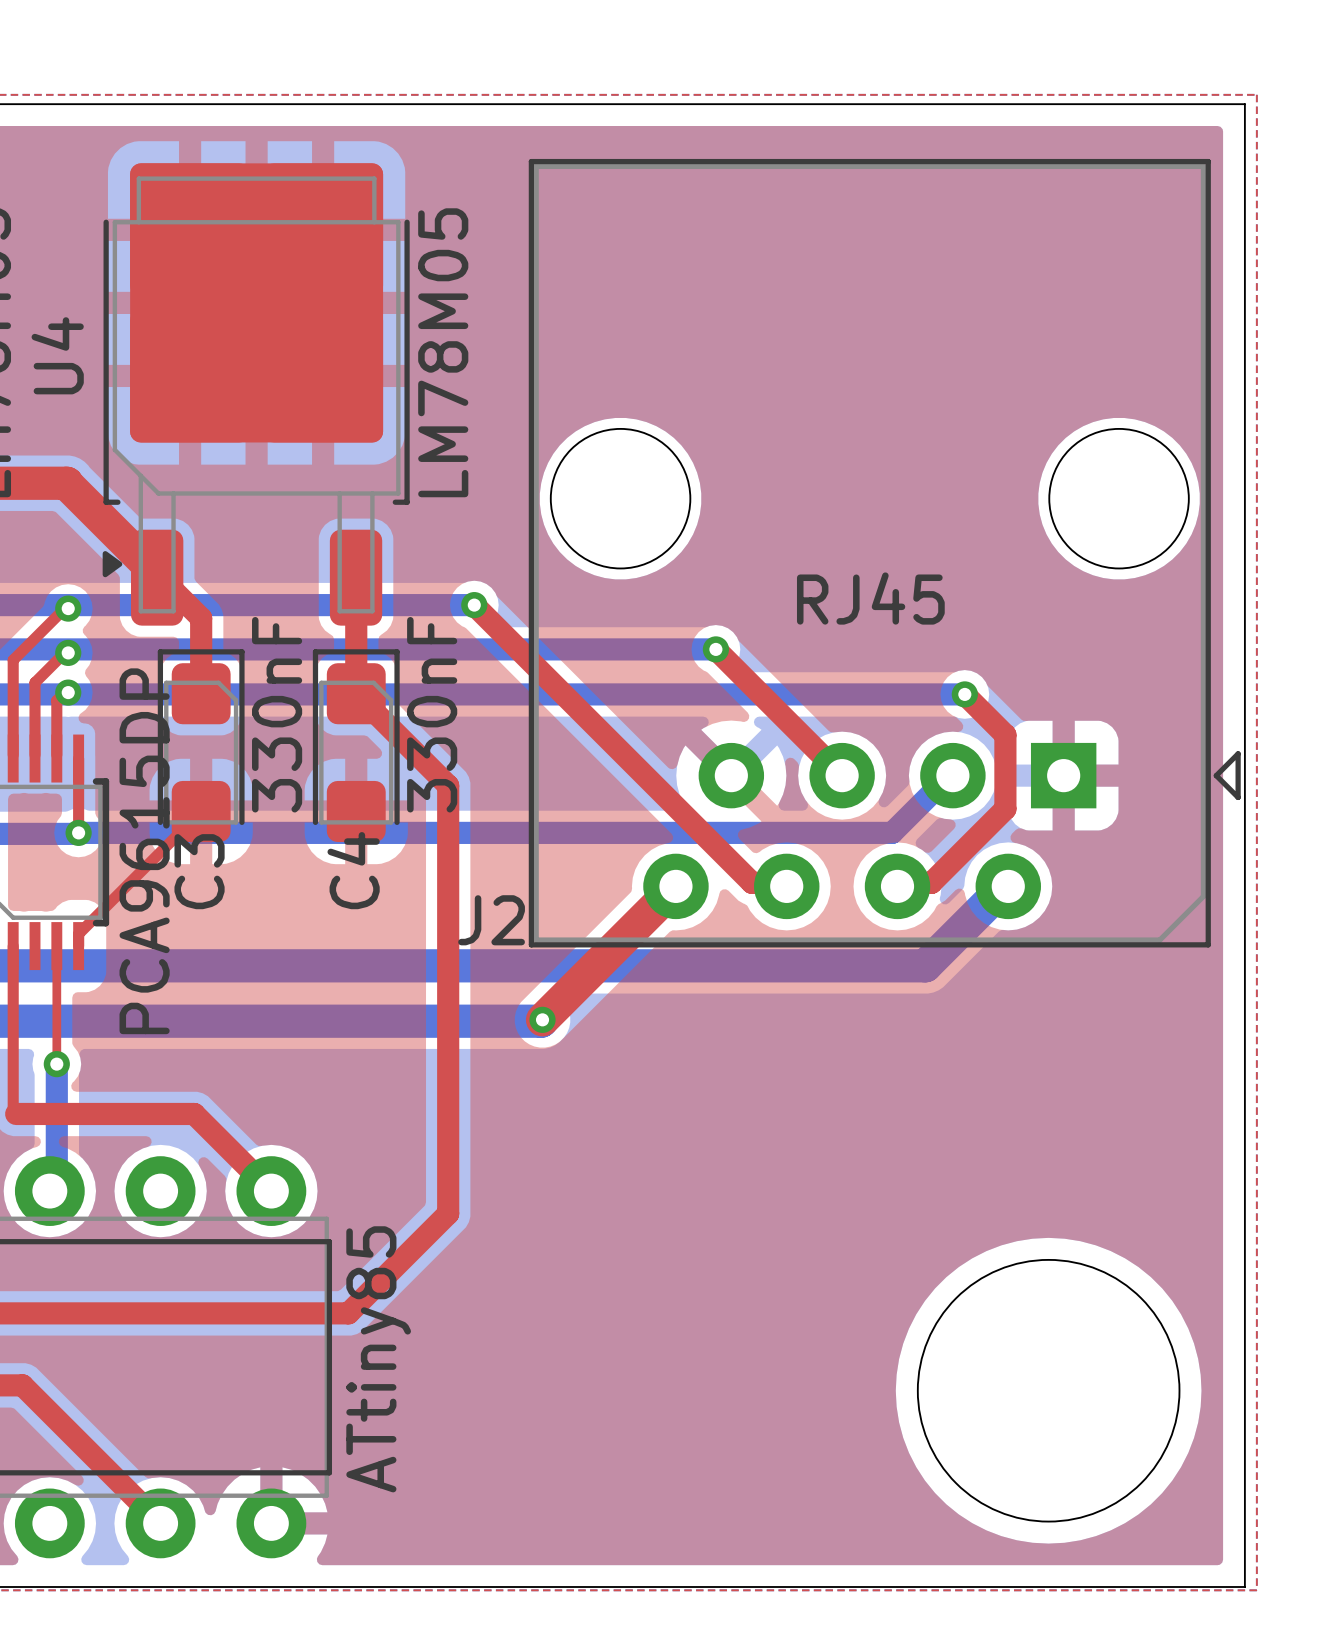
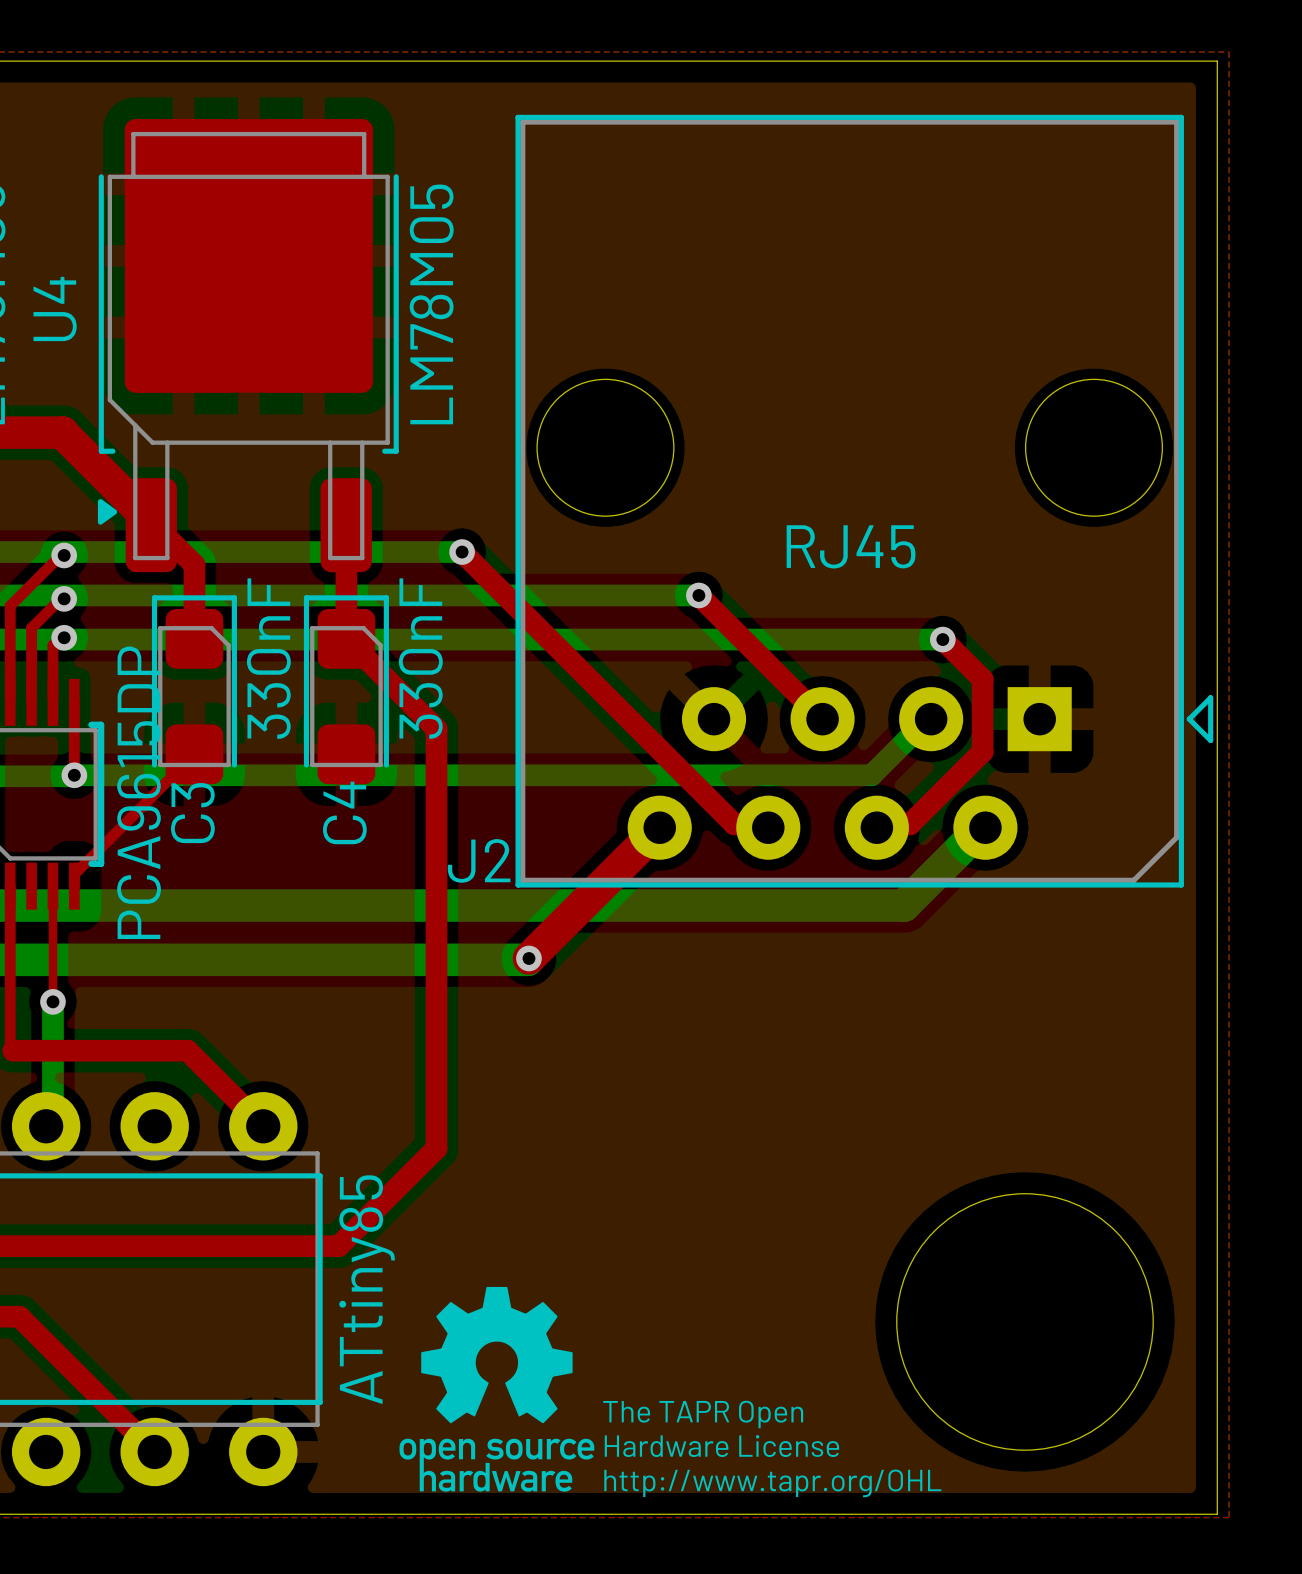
drawing: none -> [399, 1286, 595, 1492]
text: none -> The TAPR Open (703, 1414)
text: none -> Hardware License (721, 1446)
text: none -> http://www.tapr.org/OHL (772, 1483)

